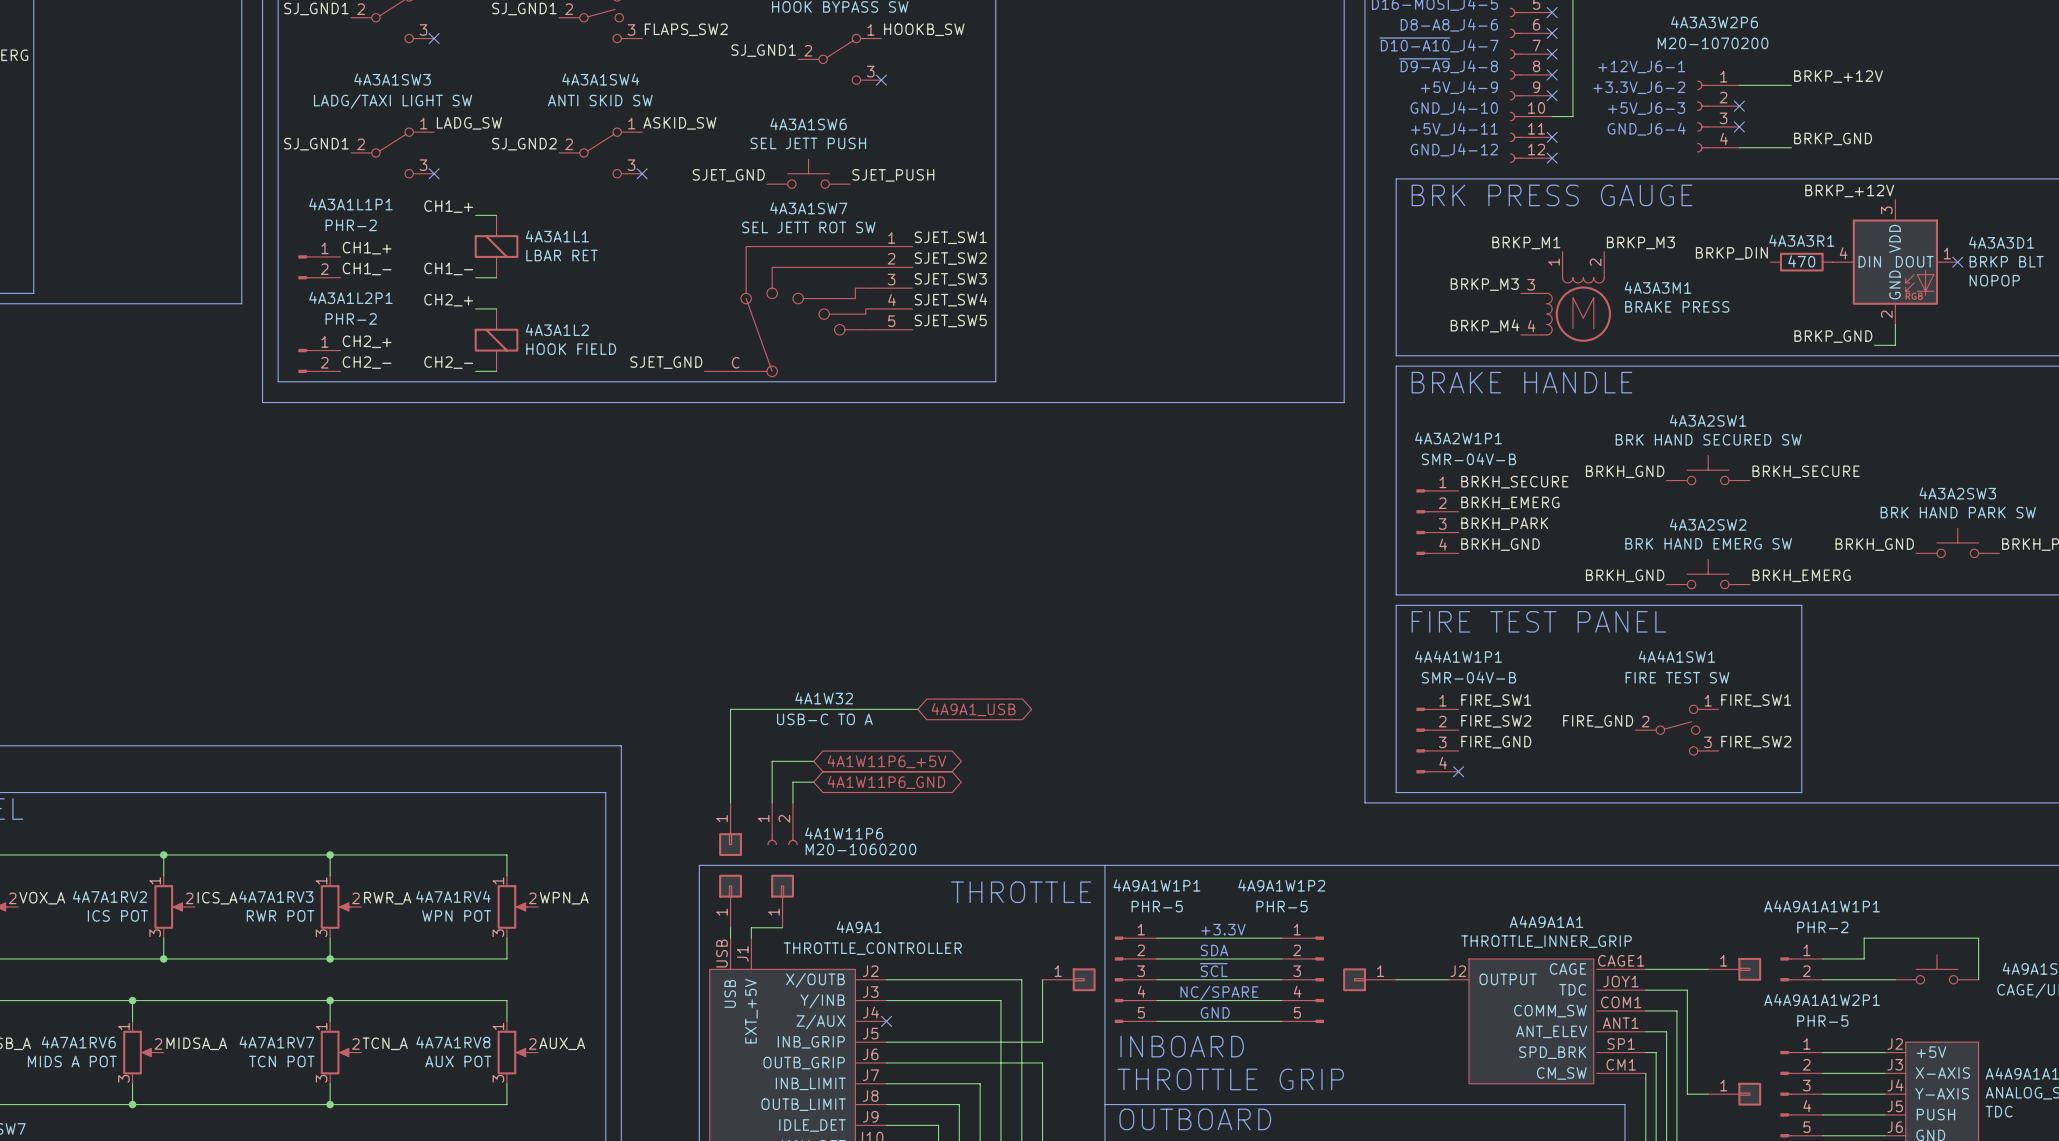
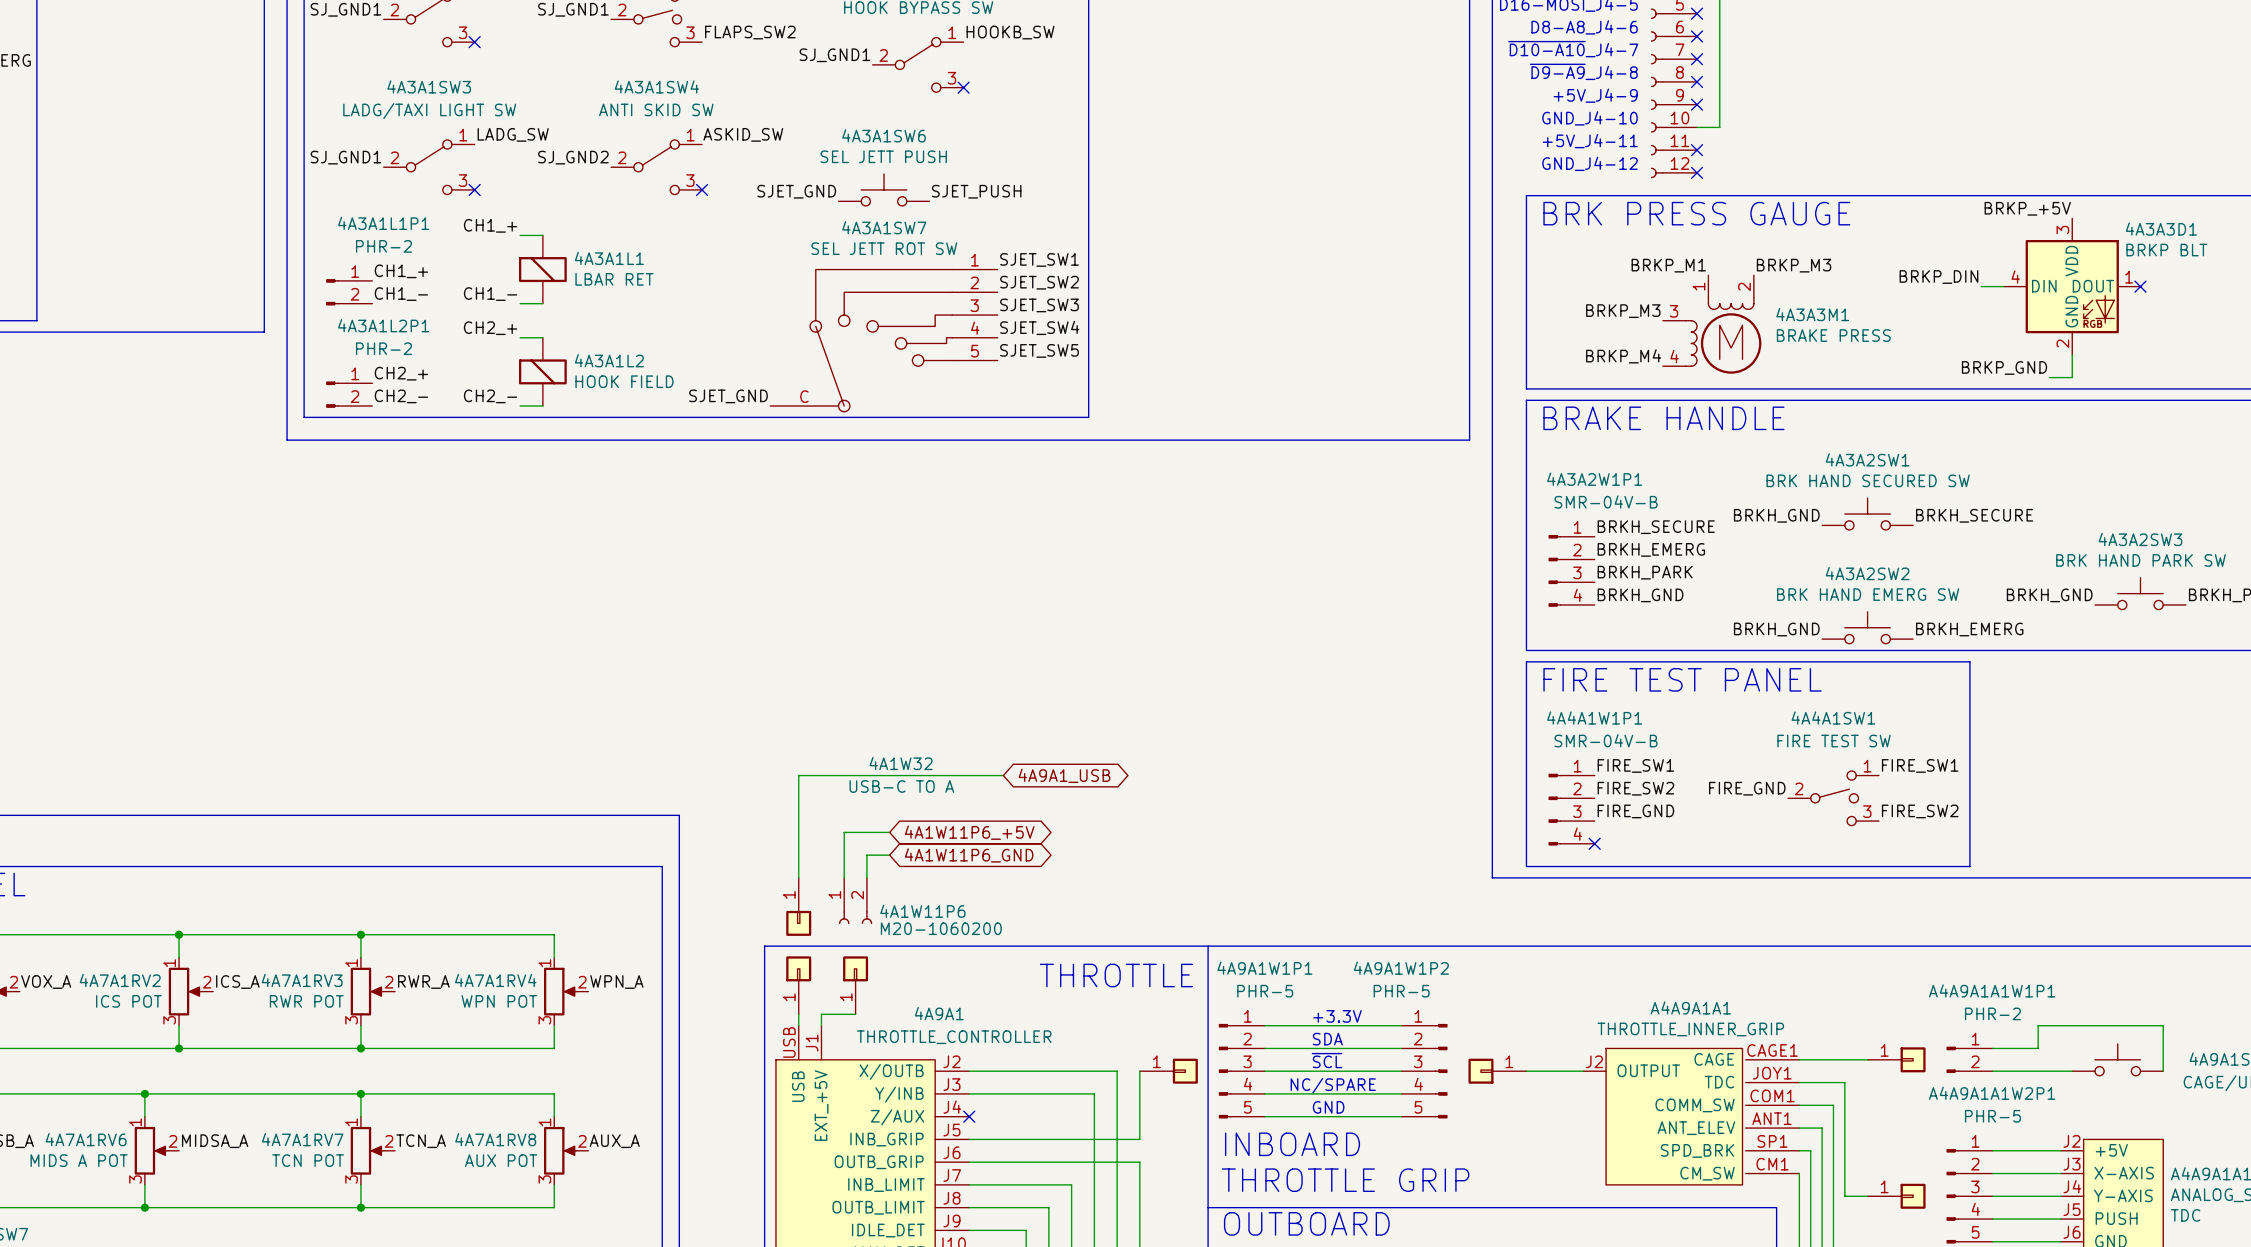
text: +12V_J6-1 (1641, 66) -> none
label: BRKP_+12V (1838, 76) -> none
wire: (1739, 85) (1791, 85) -> none
text: +3.3V_J6-2 (1639, 87) -> none
no-connect mark: (1739, 106) -> none
text: +5V_J6-3 (1646, 108) -> none
4A3A3W2P6: M20-1070200 (1718, 116) -> none
no-connect mark: (1739, 126) -> none
text: GND_J6-4 (1646, 129) -> none
label: BRKP_GND (1833, 138) -> none
wire: (1739, 147) (1791, 147) -> none
label: BRKP_+12V (1849, 190) -> BRKP_+5V (2027, 208)
4A3A3D1 name position: 4A3A3D1 (2001, 242) -> 4A3A3D1 (2161, 229)
label position: BRKP_DIN (1731, 253) -> BRKP_DIN (1938, 277)
4A3A3D1 value position: BRKP BLT (2006, 261) -> BRKP BLT (2166, 250)
4A3A3R1: 470 (1801, 262) -> none
4A3A3D1 text: NOPOP (1994, 280) -> none

